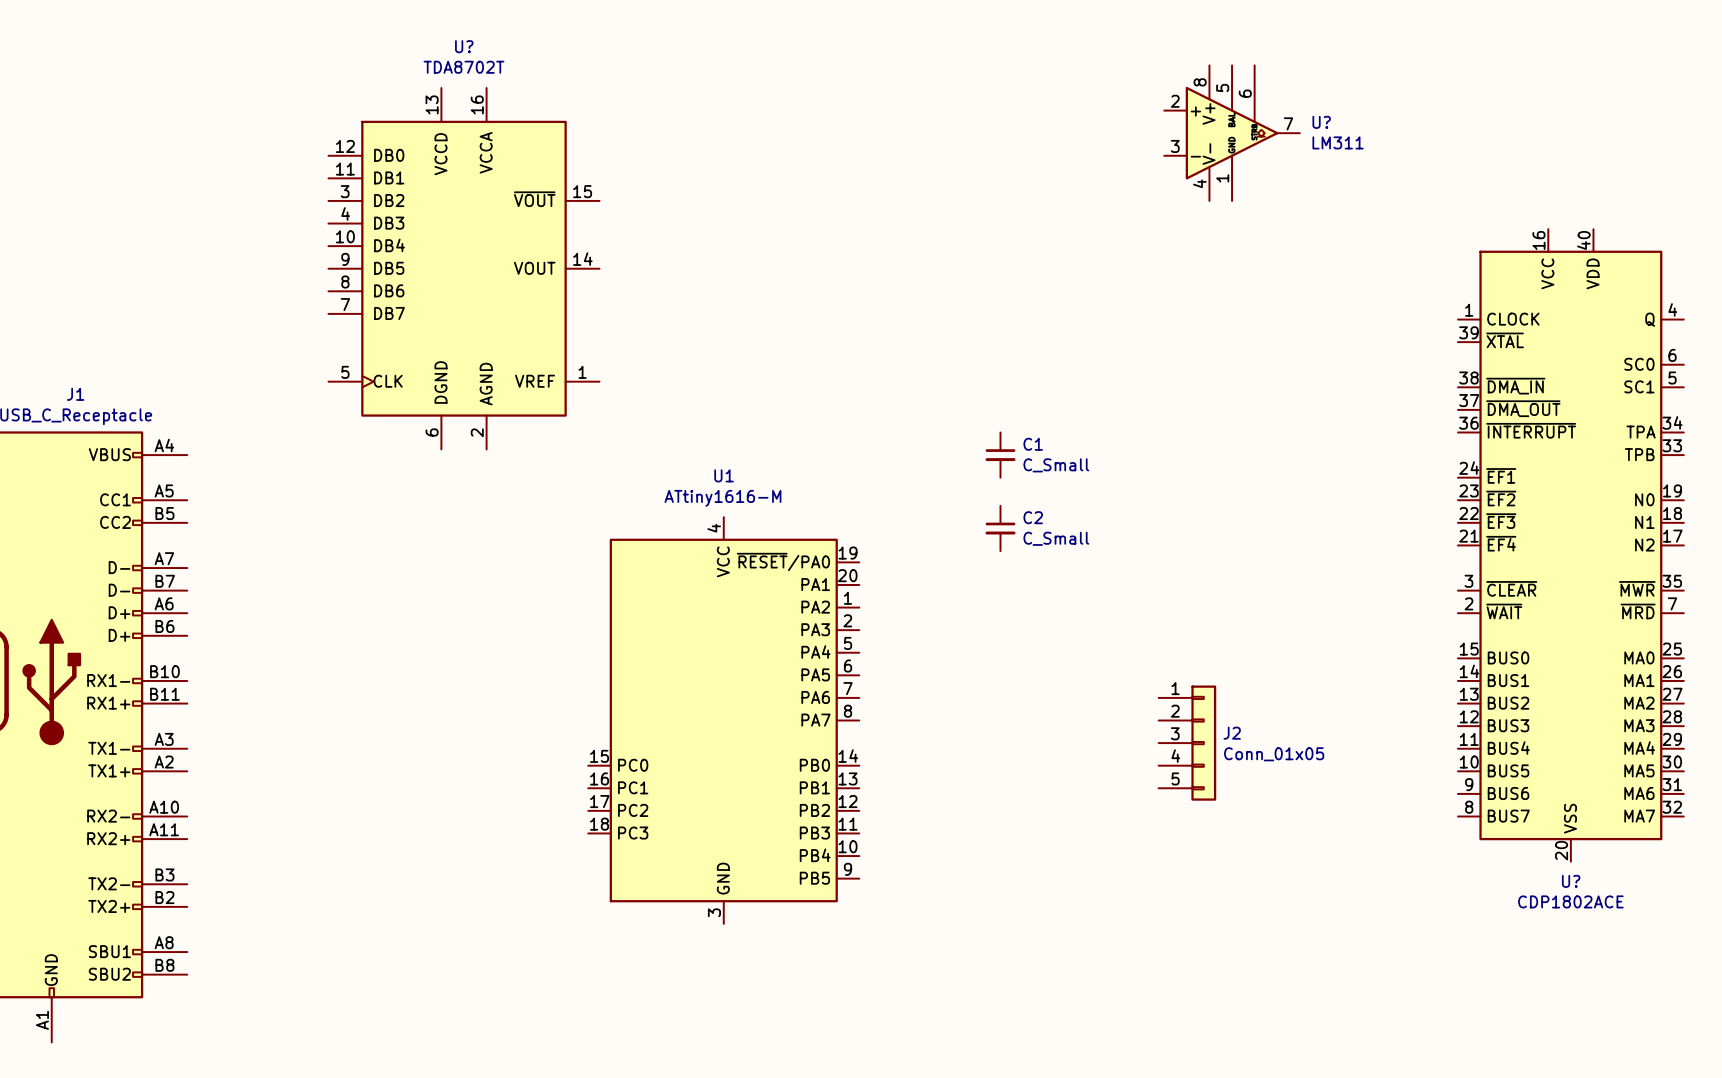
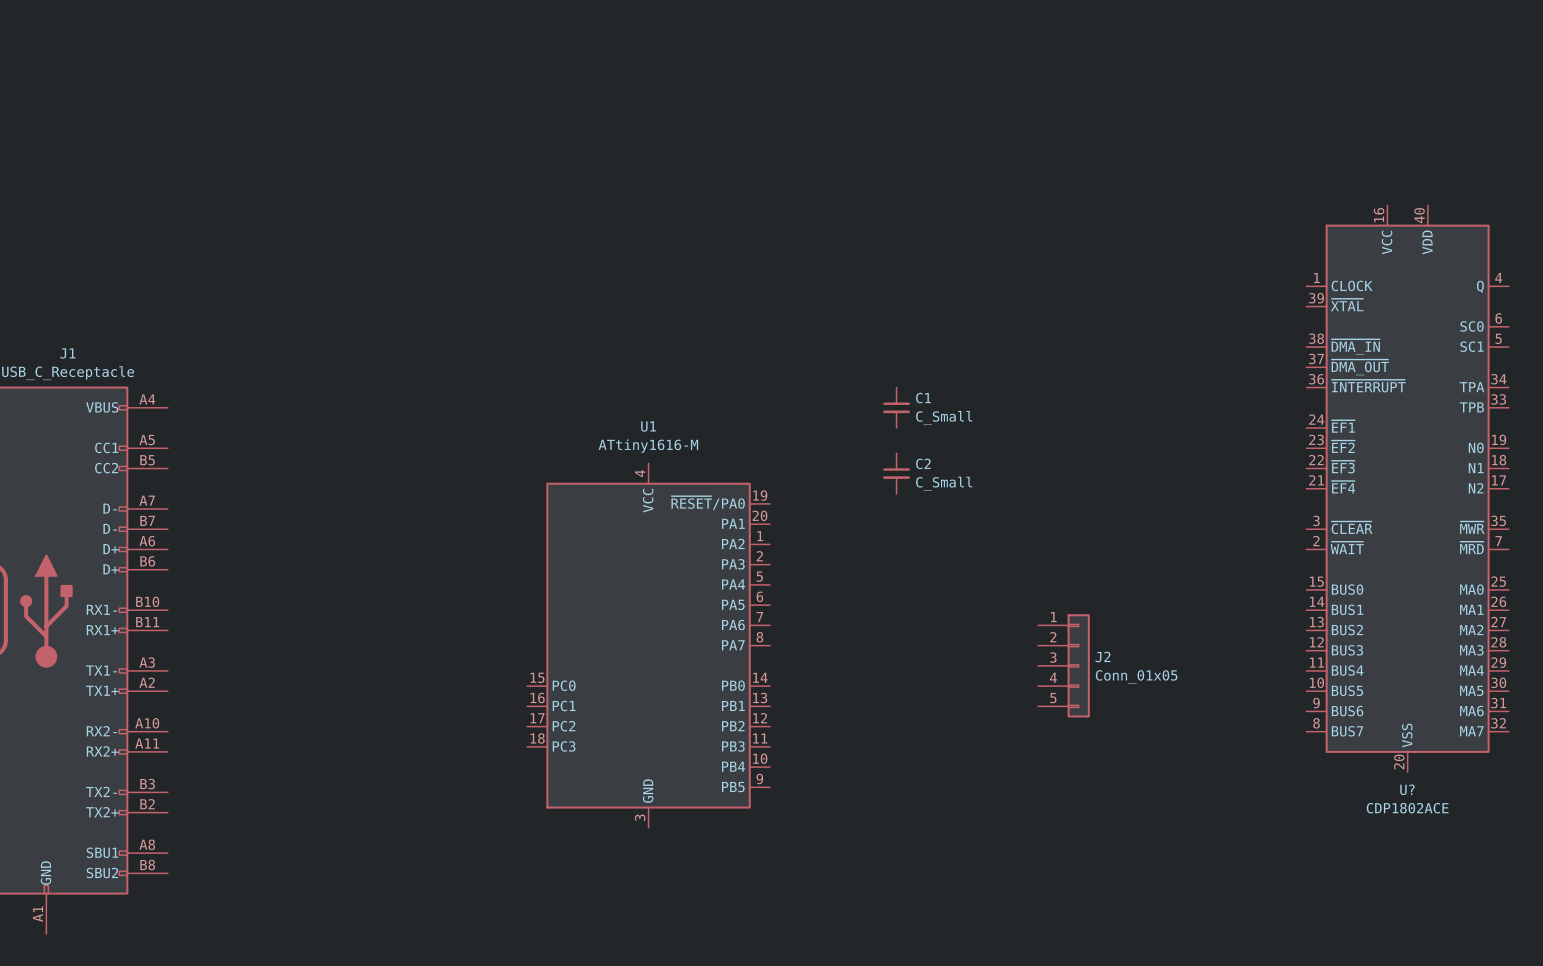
U?: LM311 (1232, 133) -> none
U?: TDA8702T (463, 268) -> none

